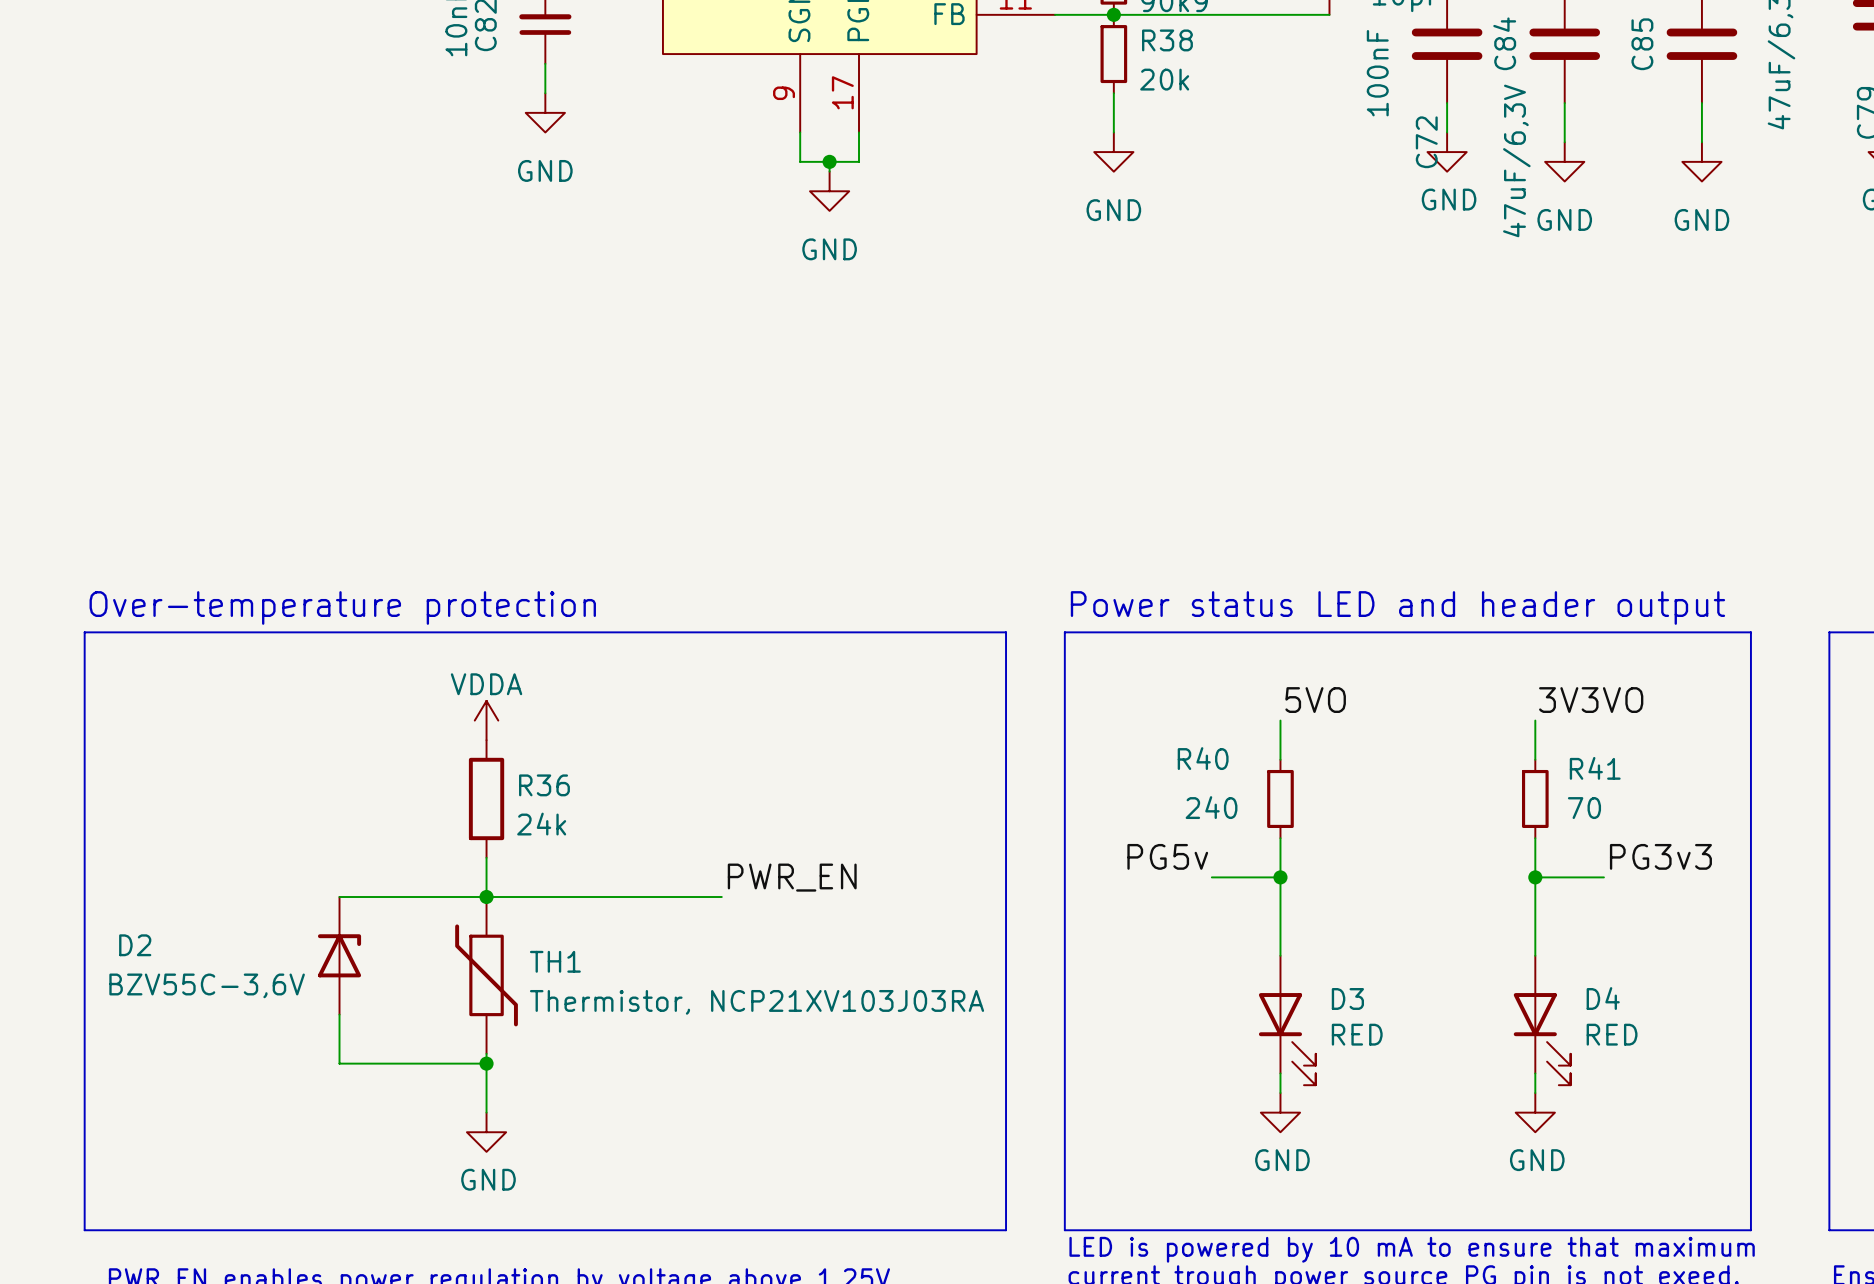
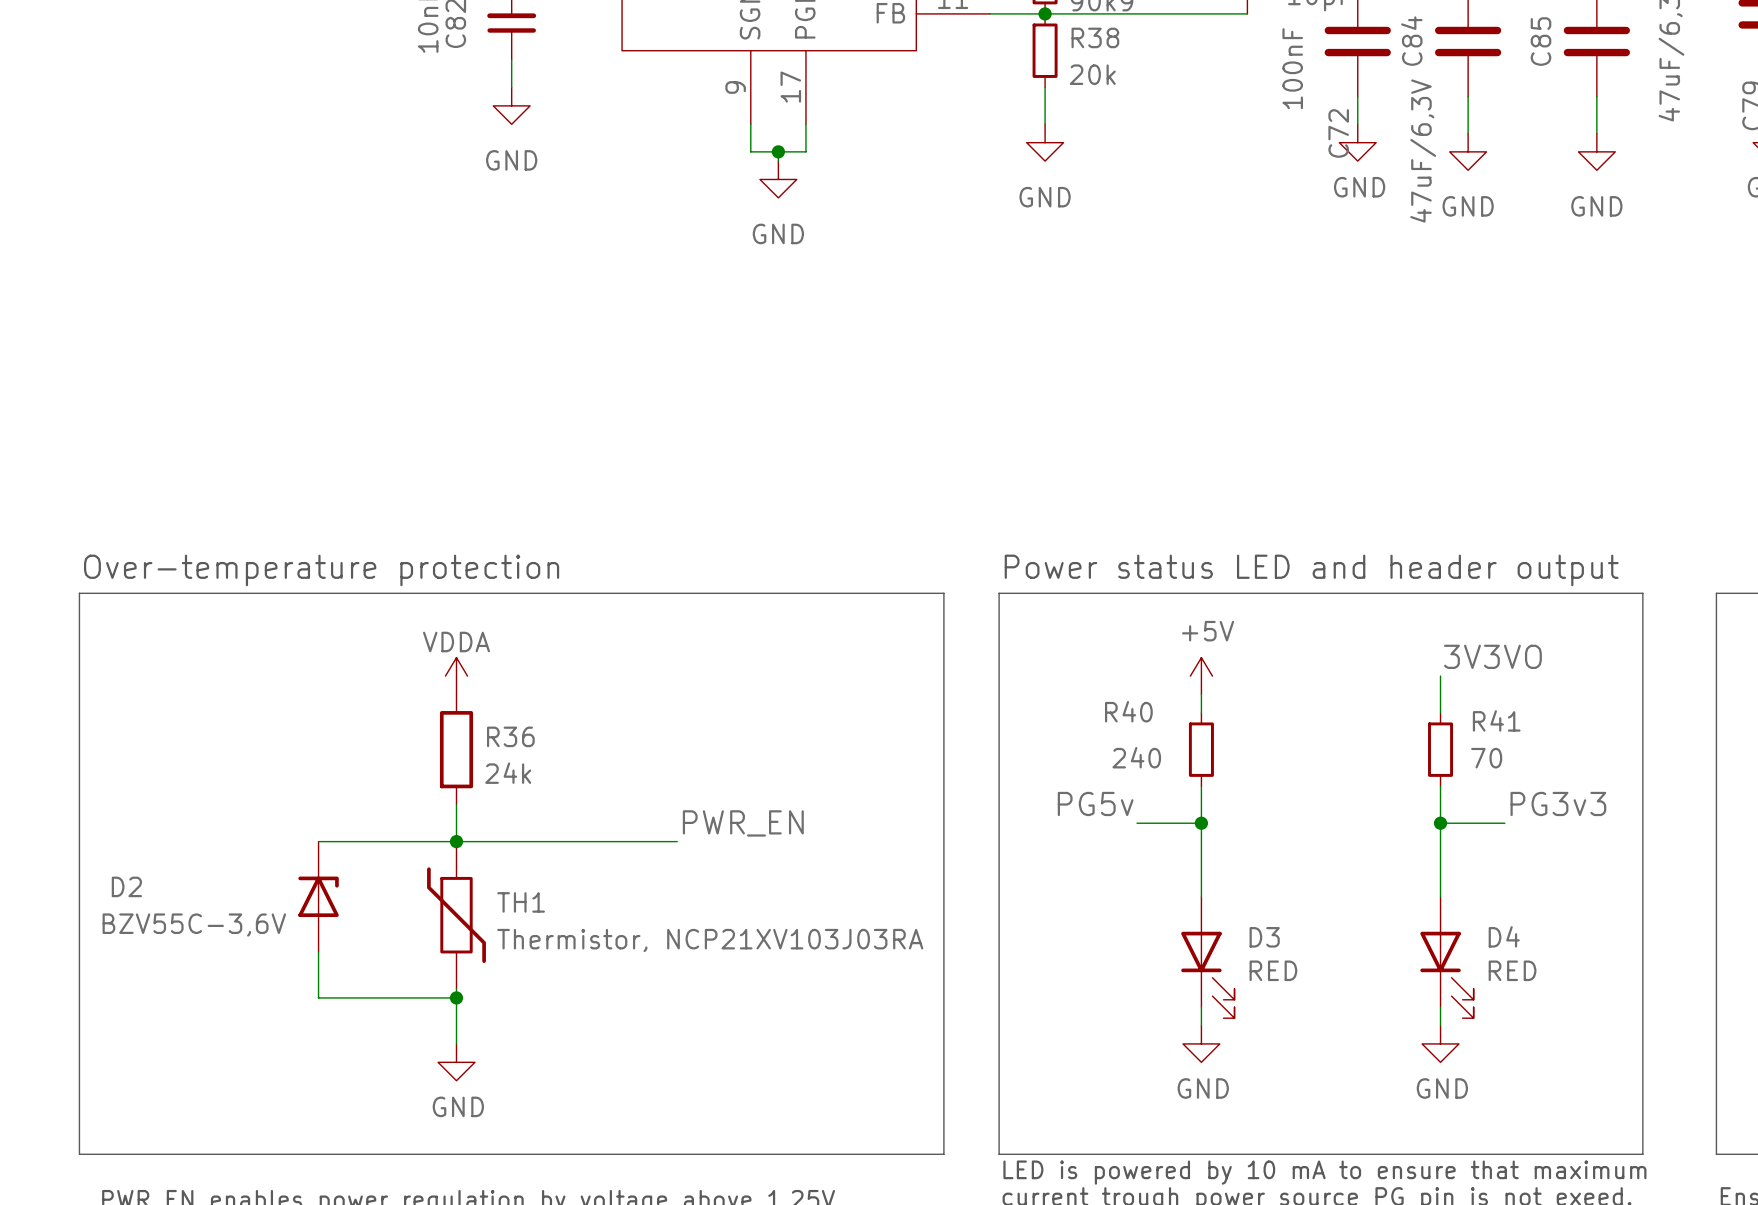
label: 5VO (1315, 700) -> none
power symbol: none -> +5V (1201, 676)

